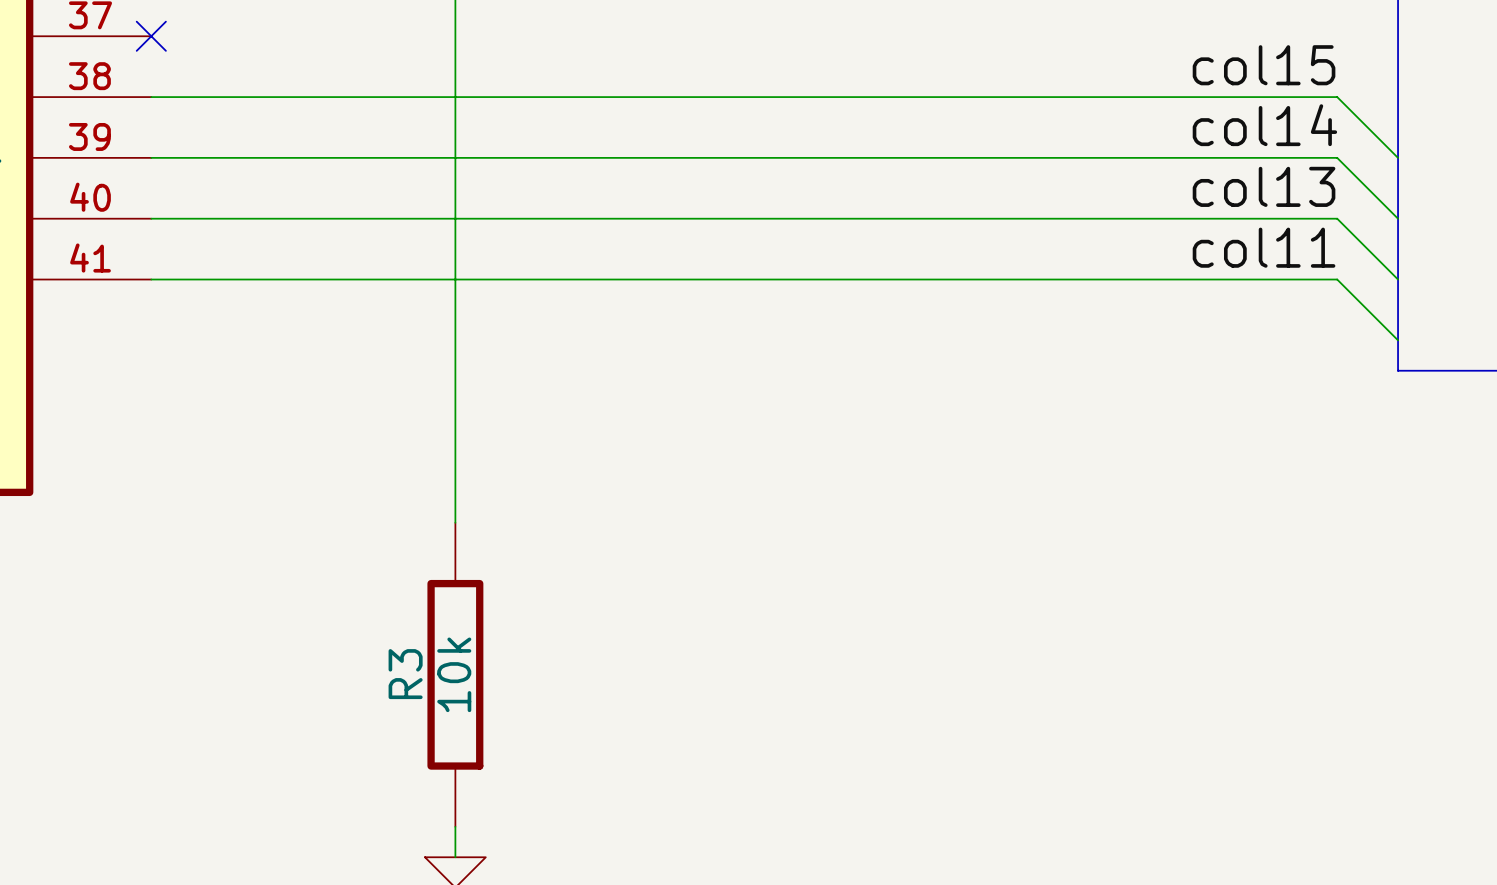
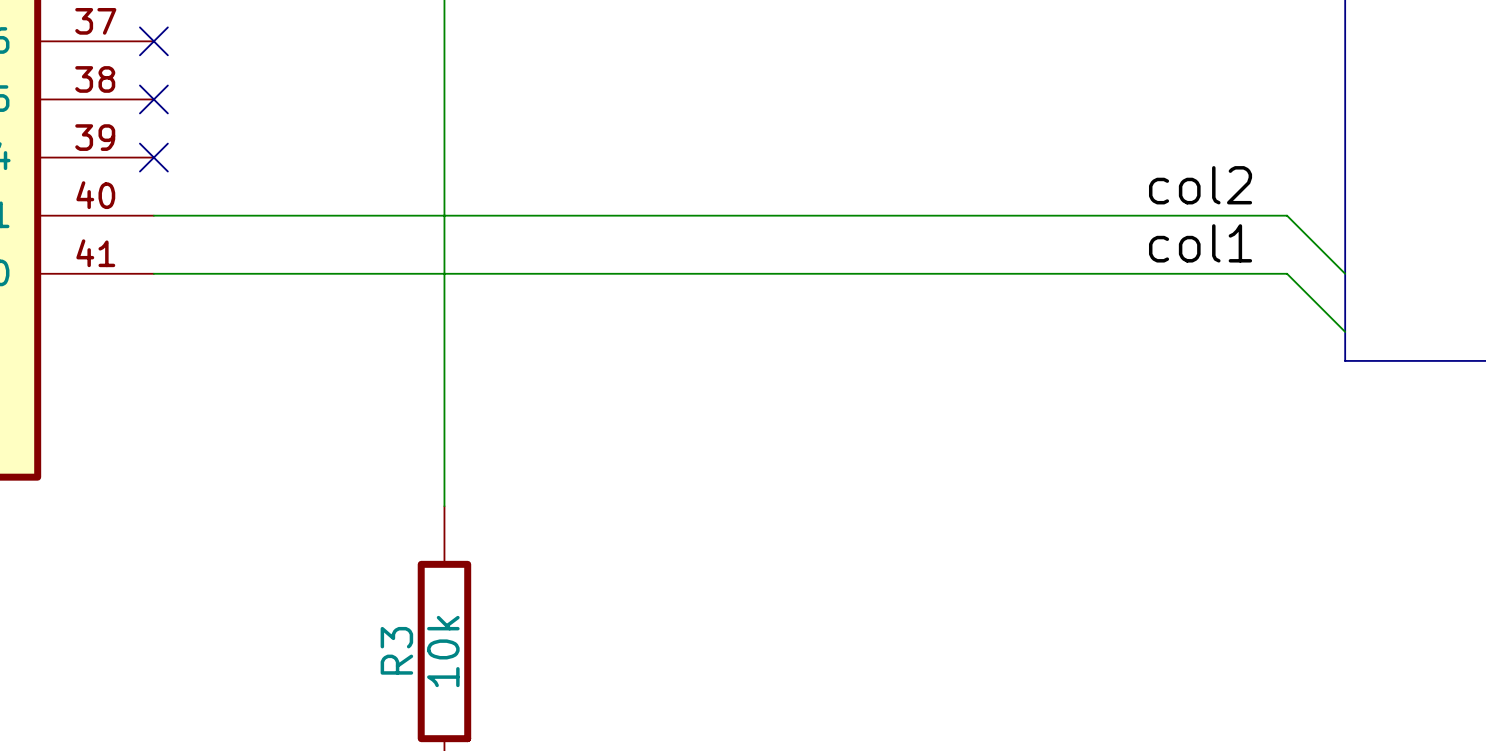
label: col15 (1264, 65) -> none
wire: (151, 97) (1337, 97) (1398, 157) -> none
no-connect mark: none -> (153, 99)
label: col14 (1264, 125) -> none
wire: (151, 157) (1337, 157) (1398, 218) -> none
no-connect mark: none -> (153, 157)
label: col13 (1264, 186) -> col2 (1200, 185)
label: col11 (1264, 247) -> col1 (1200, 243)

